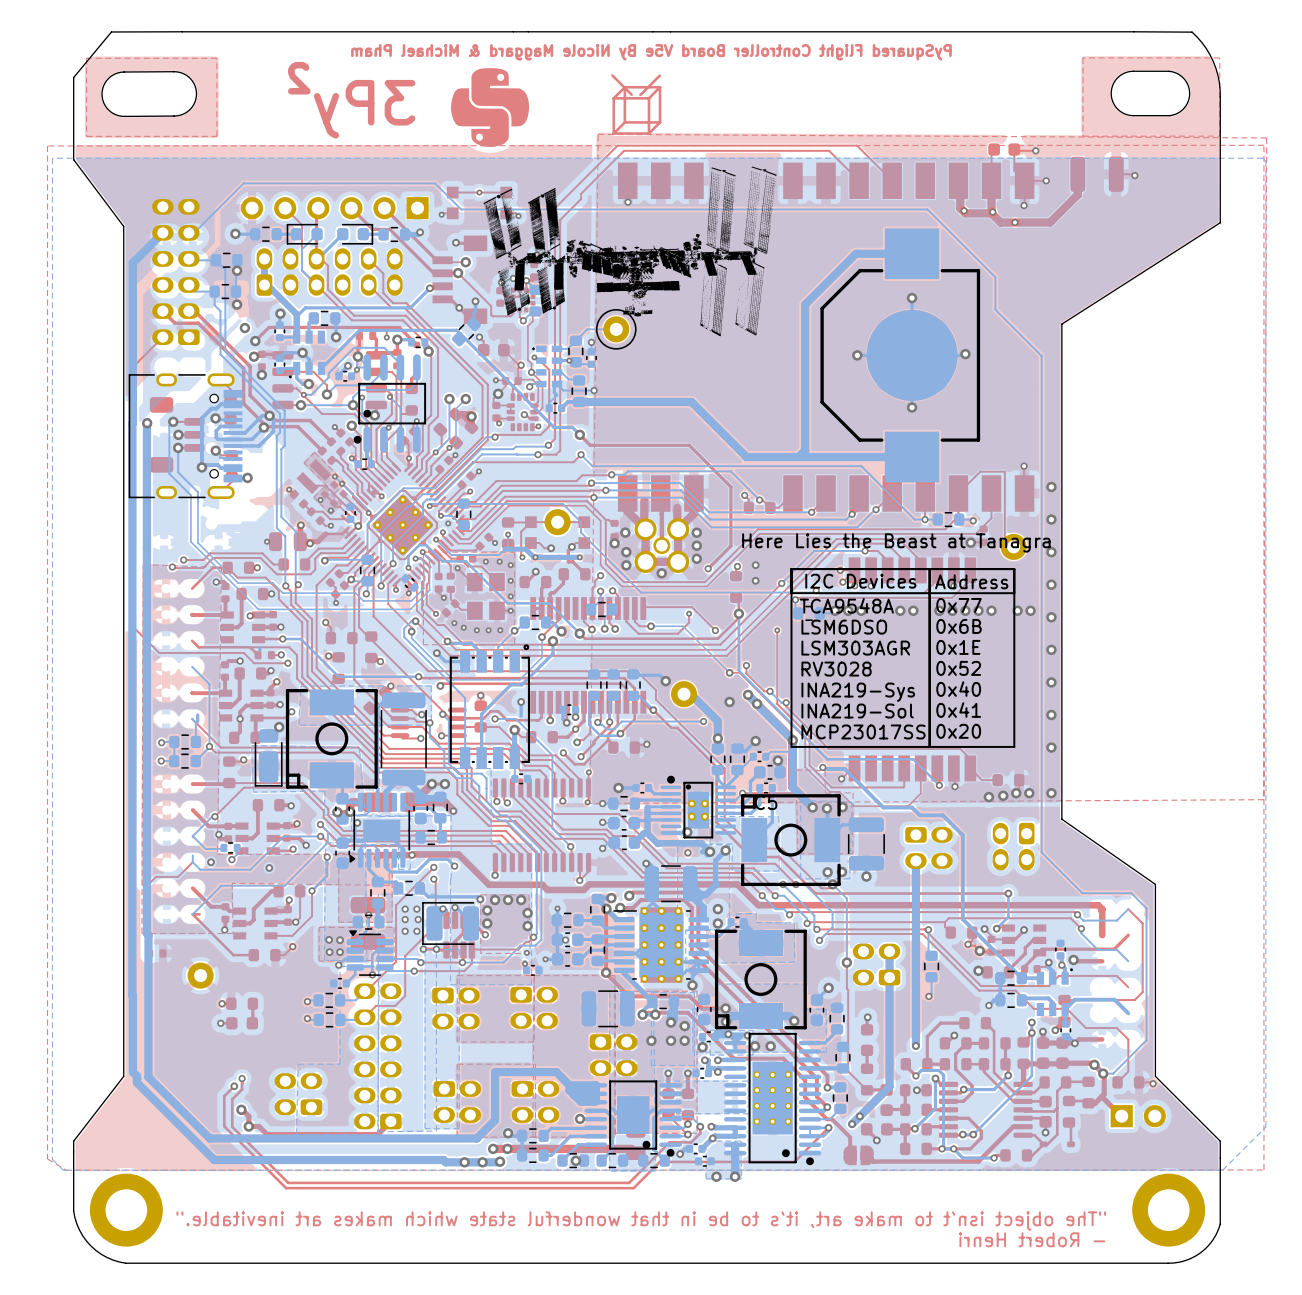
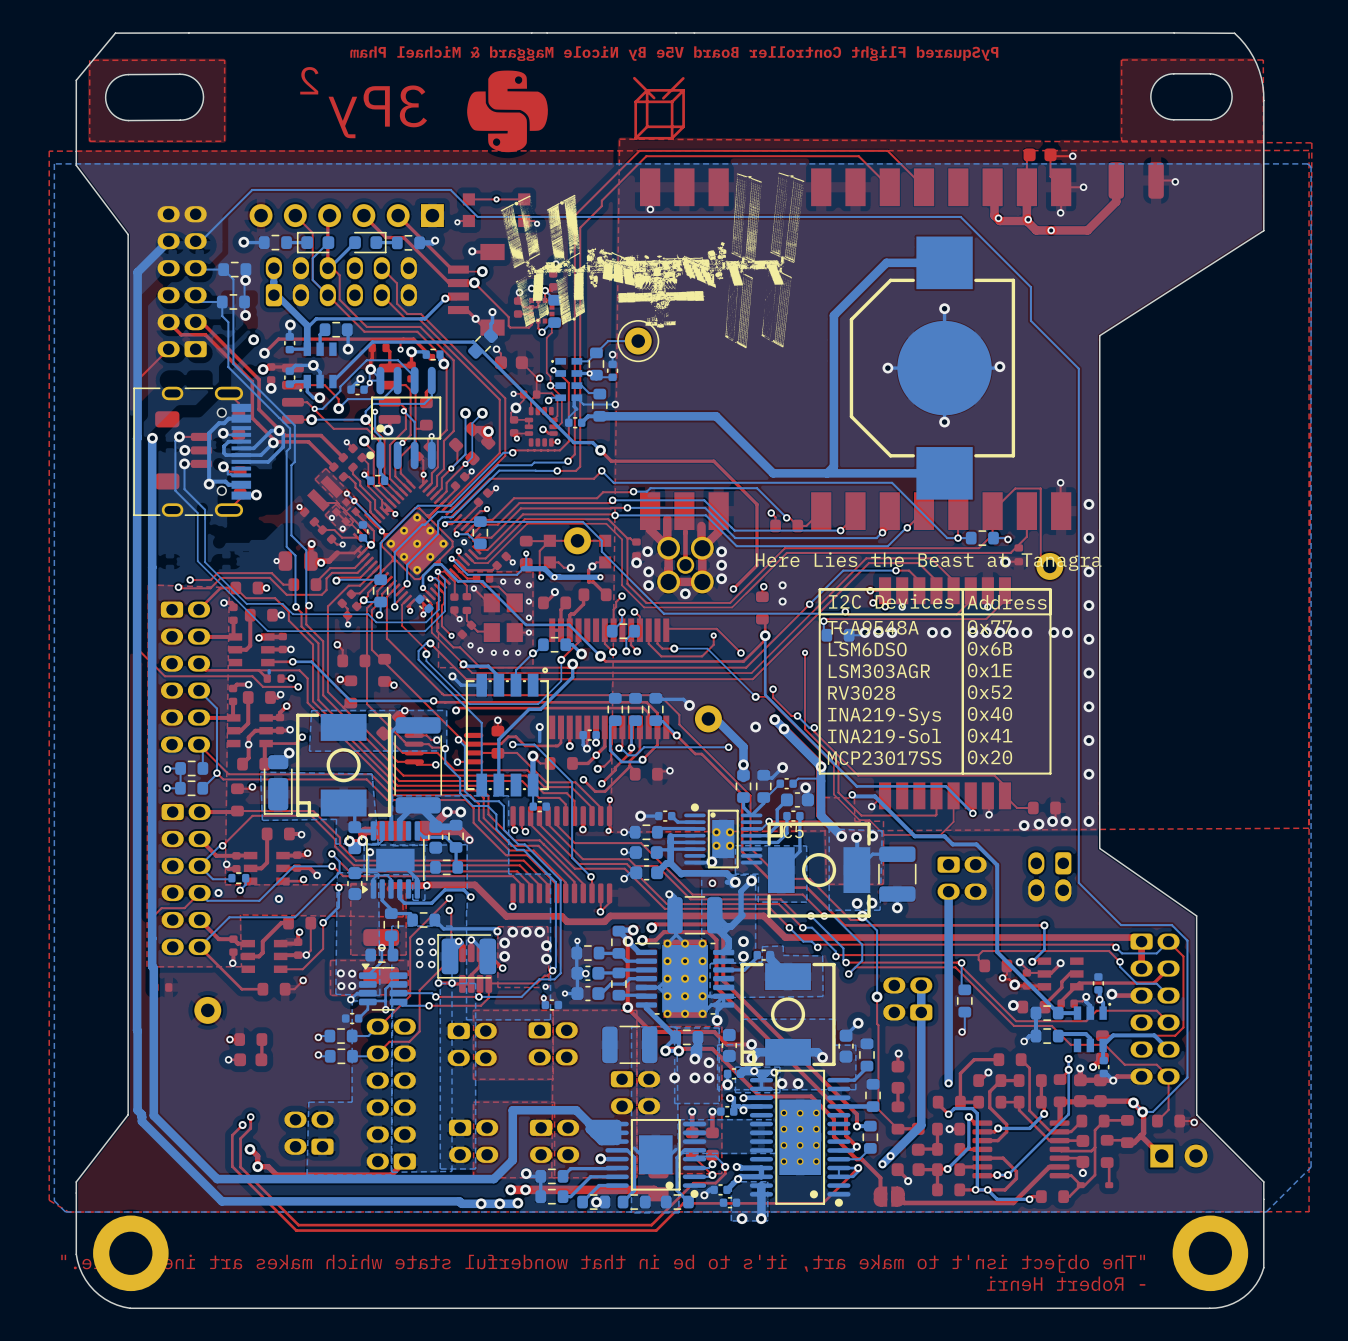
part: none -> (185, 677)
part: none -> (186, 879)
part: none -> (1155, 1009)

